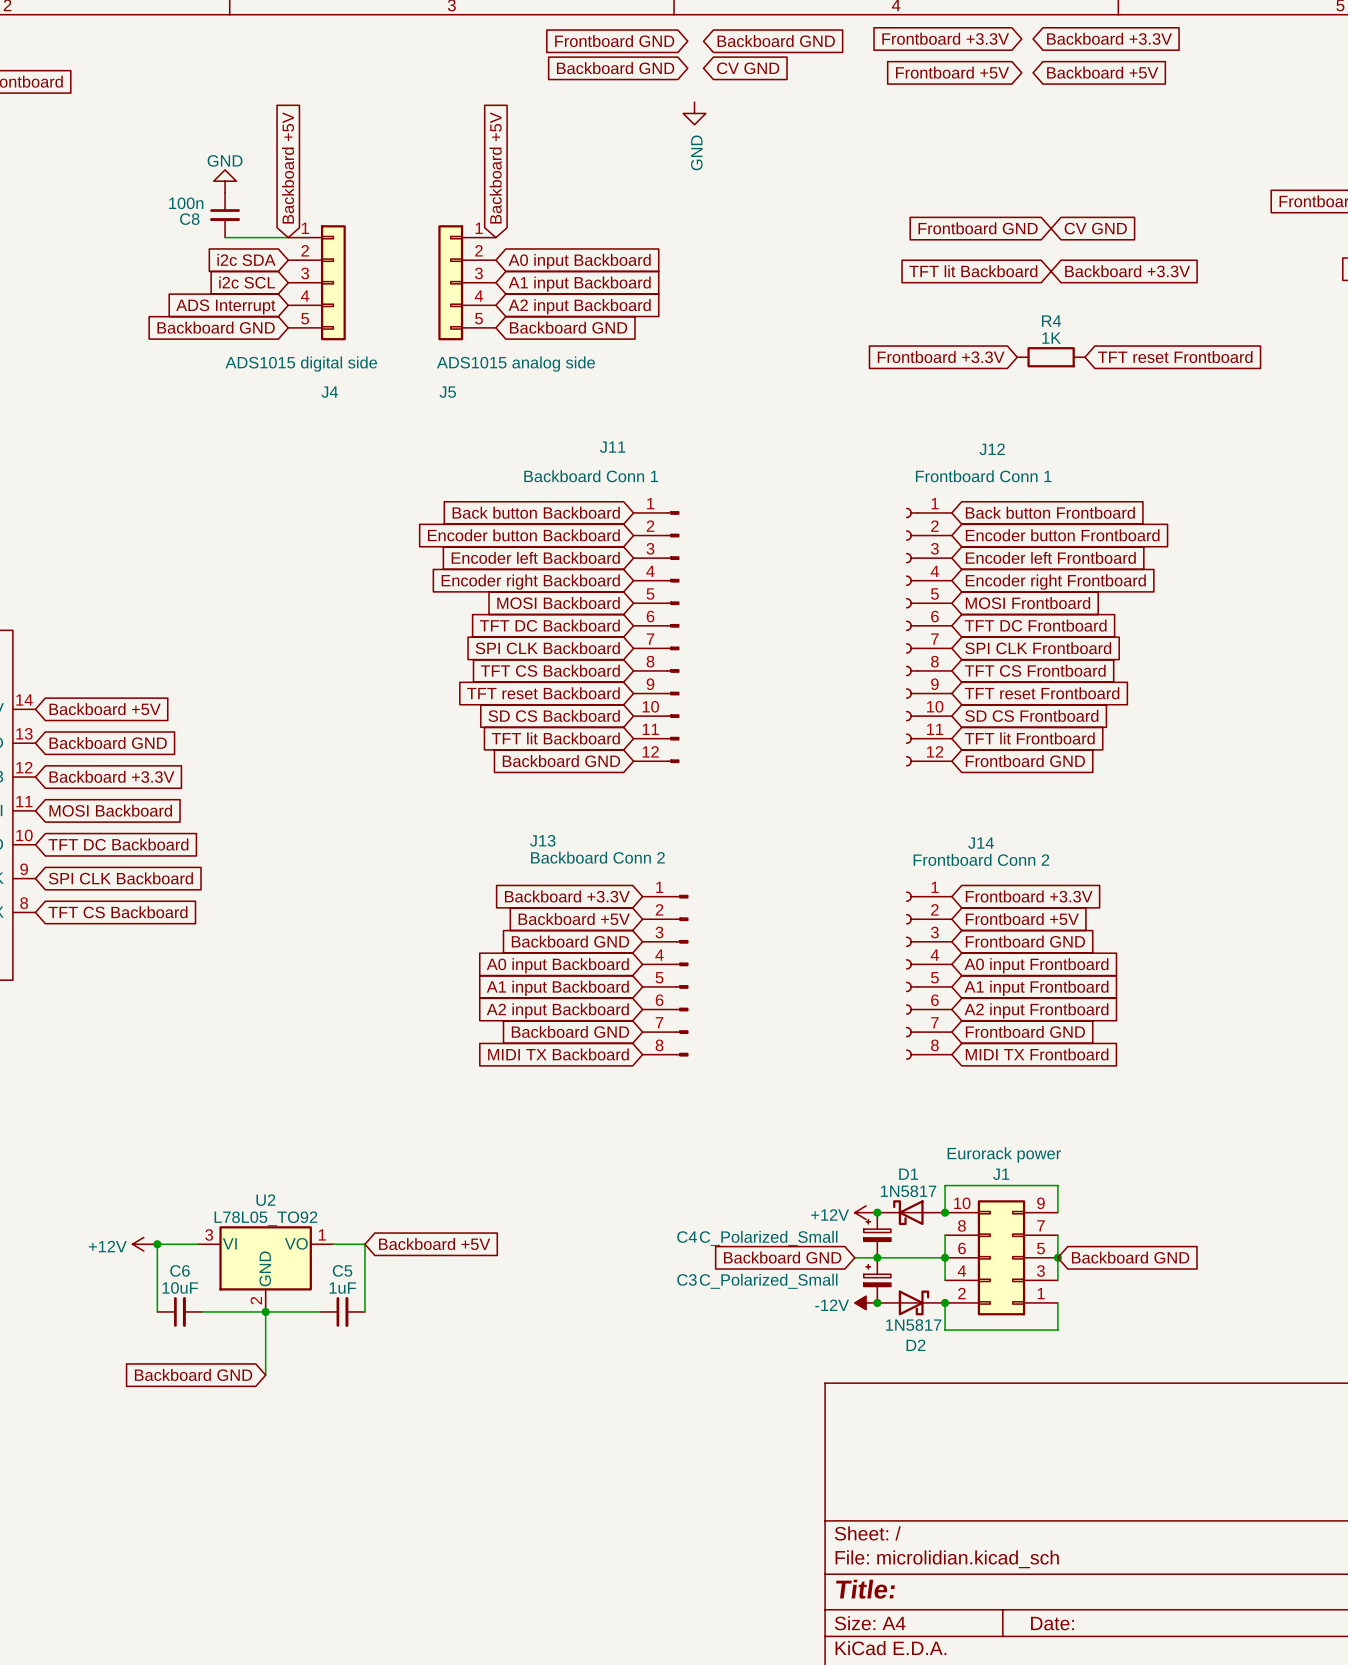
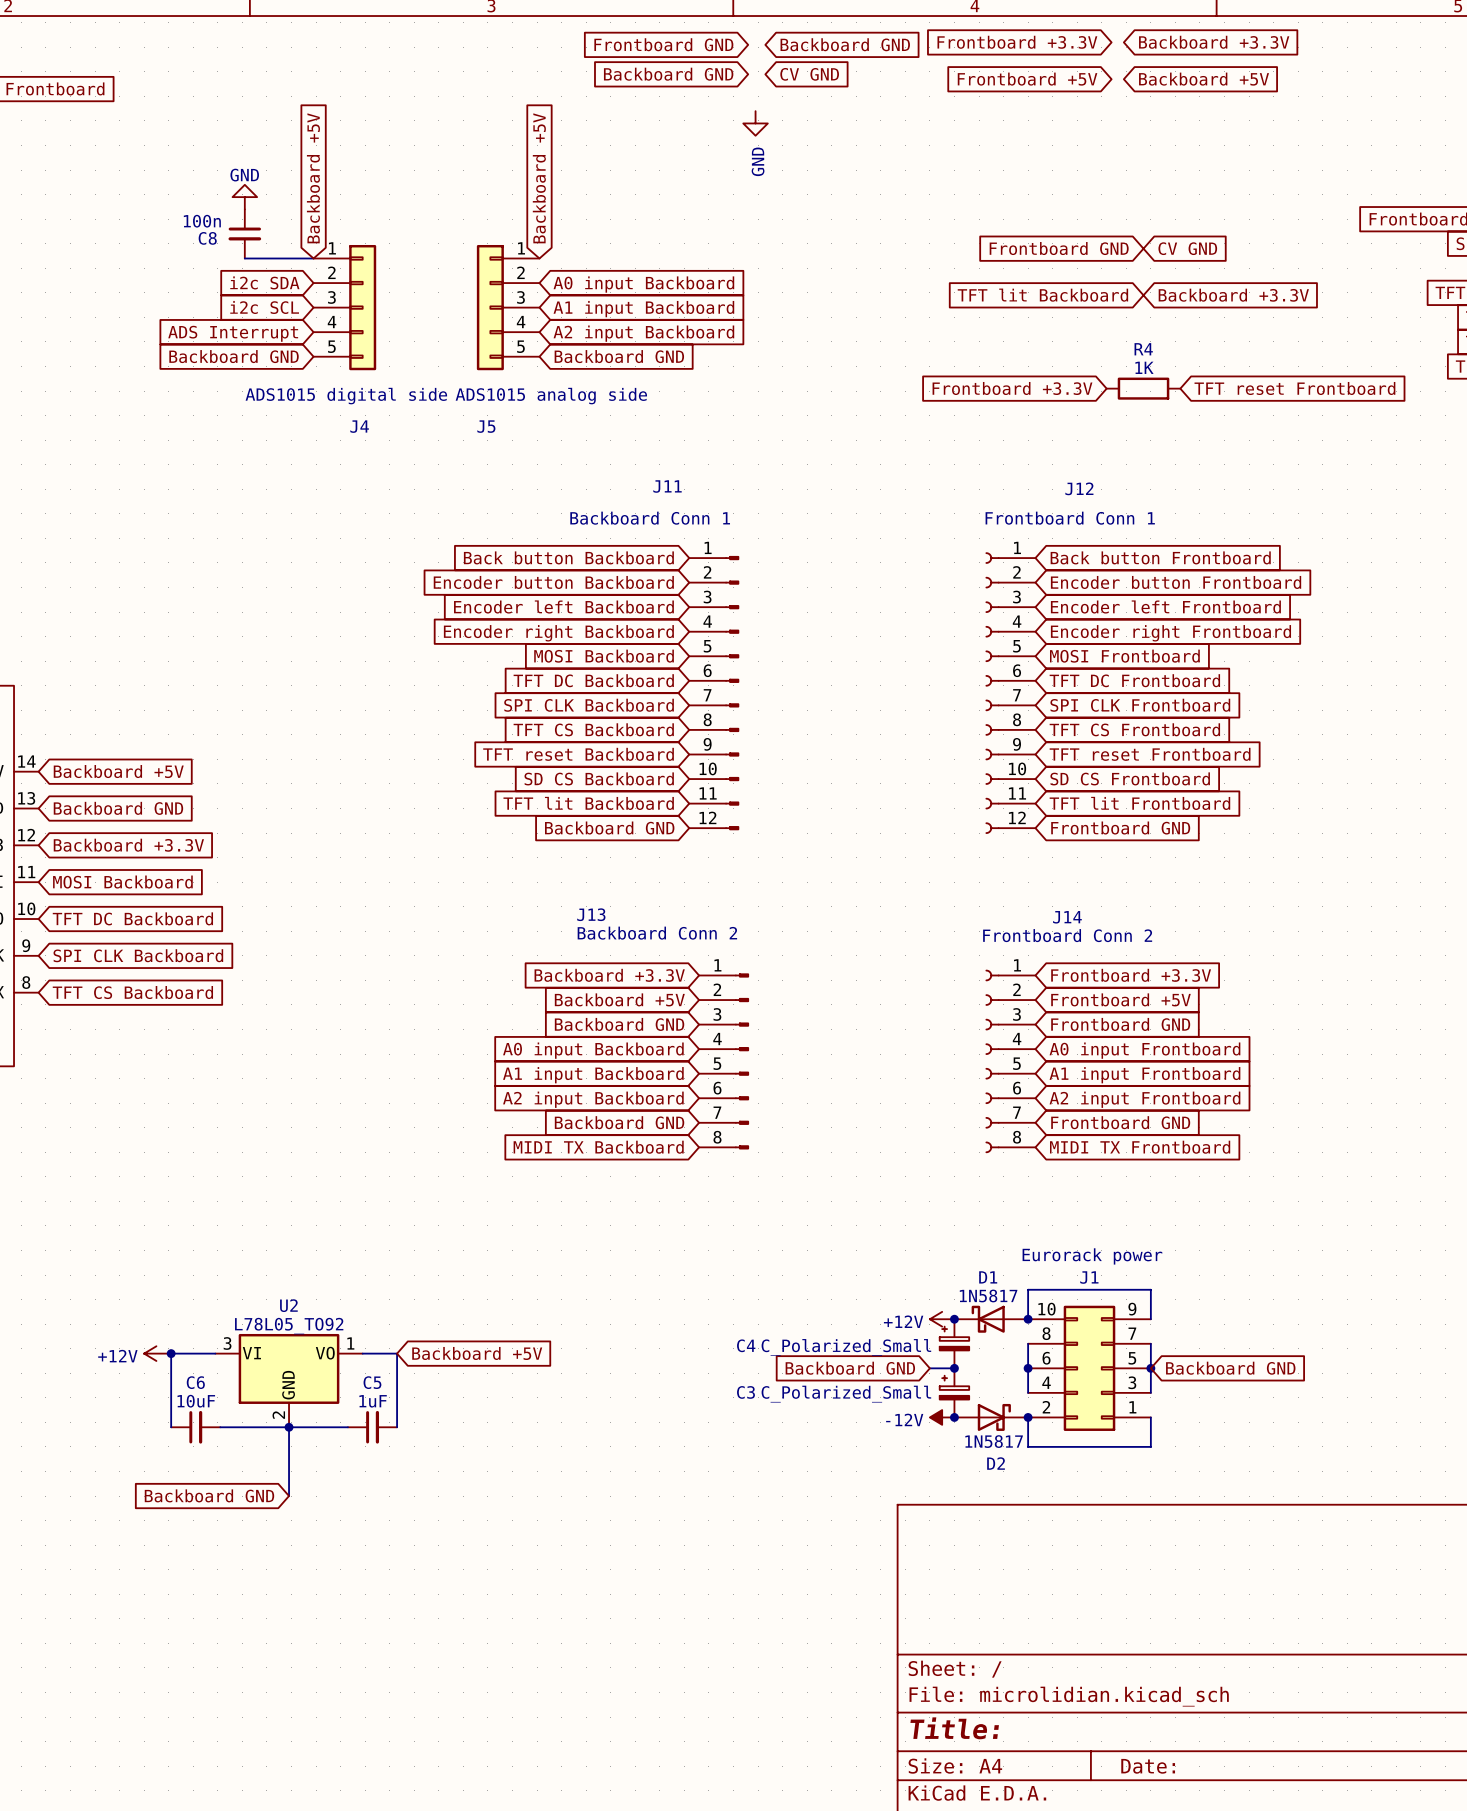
wire: (877, 1257) (945, 1257) -> none

